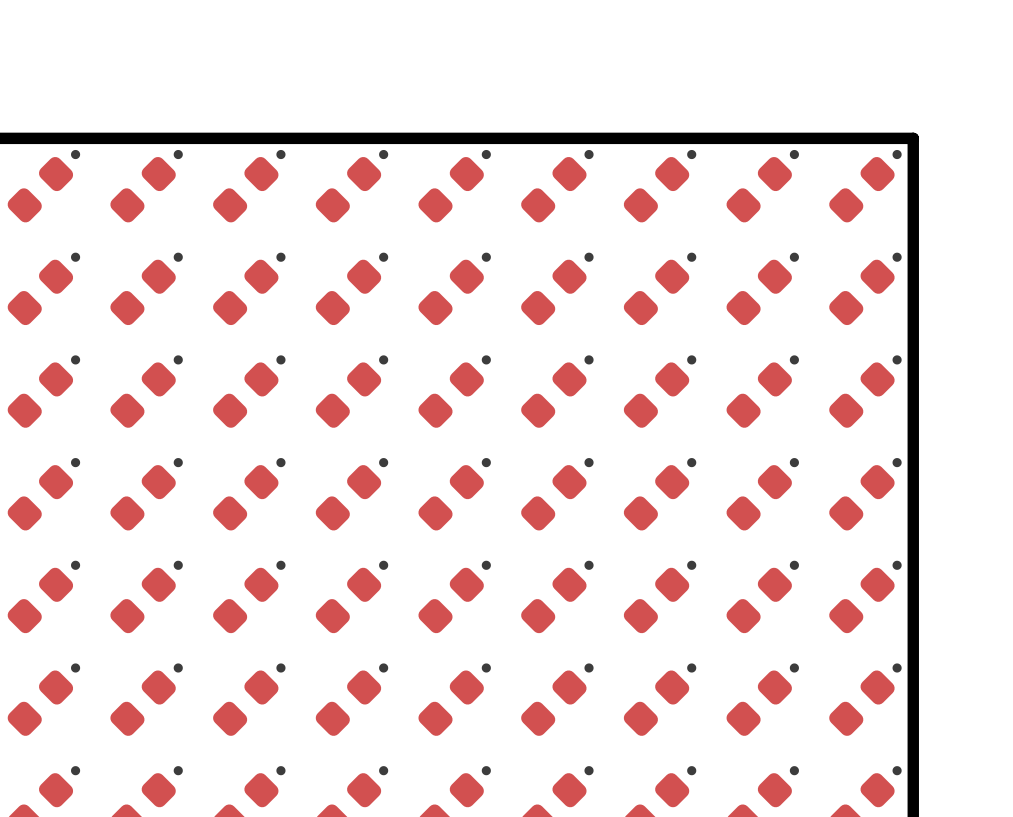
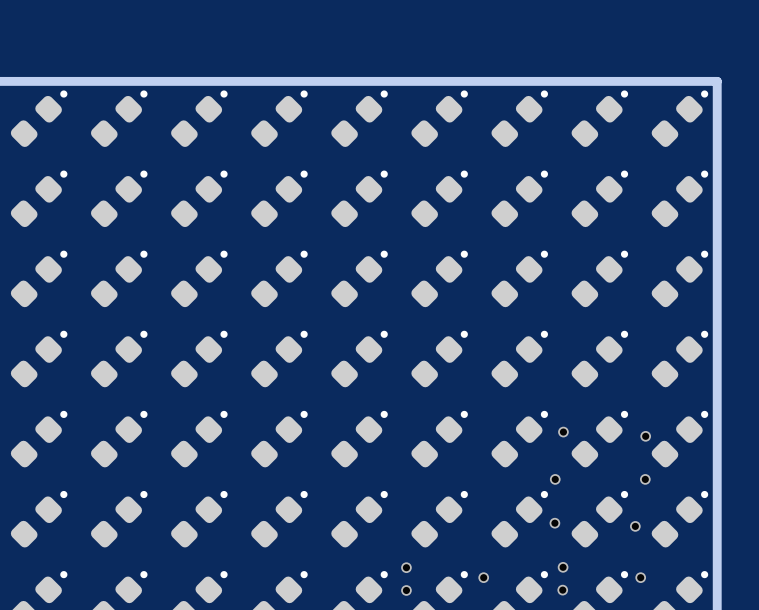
via: none -> (563, 432)
via: none -> (645, 436)
via: none -> (555, 479)
via: none -> (645, 479)
via: none -> (554, 523)
via: none -> (635, 526)
via: none -> (406, 567)
via: none -> (563, 567)
via: none -> (483, 577)
via: none -> (640, 577)
via: none -> (562, 590)
via: none -> (406, 590)

